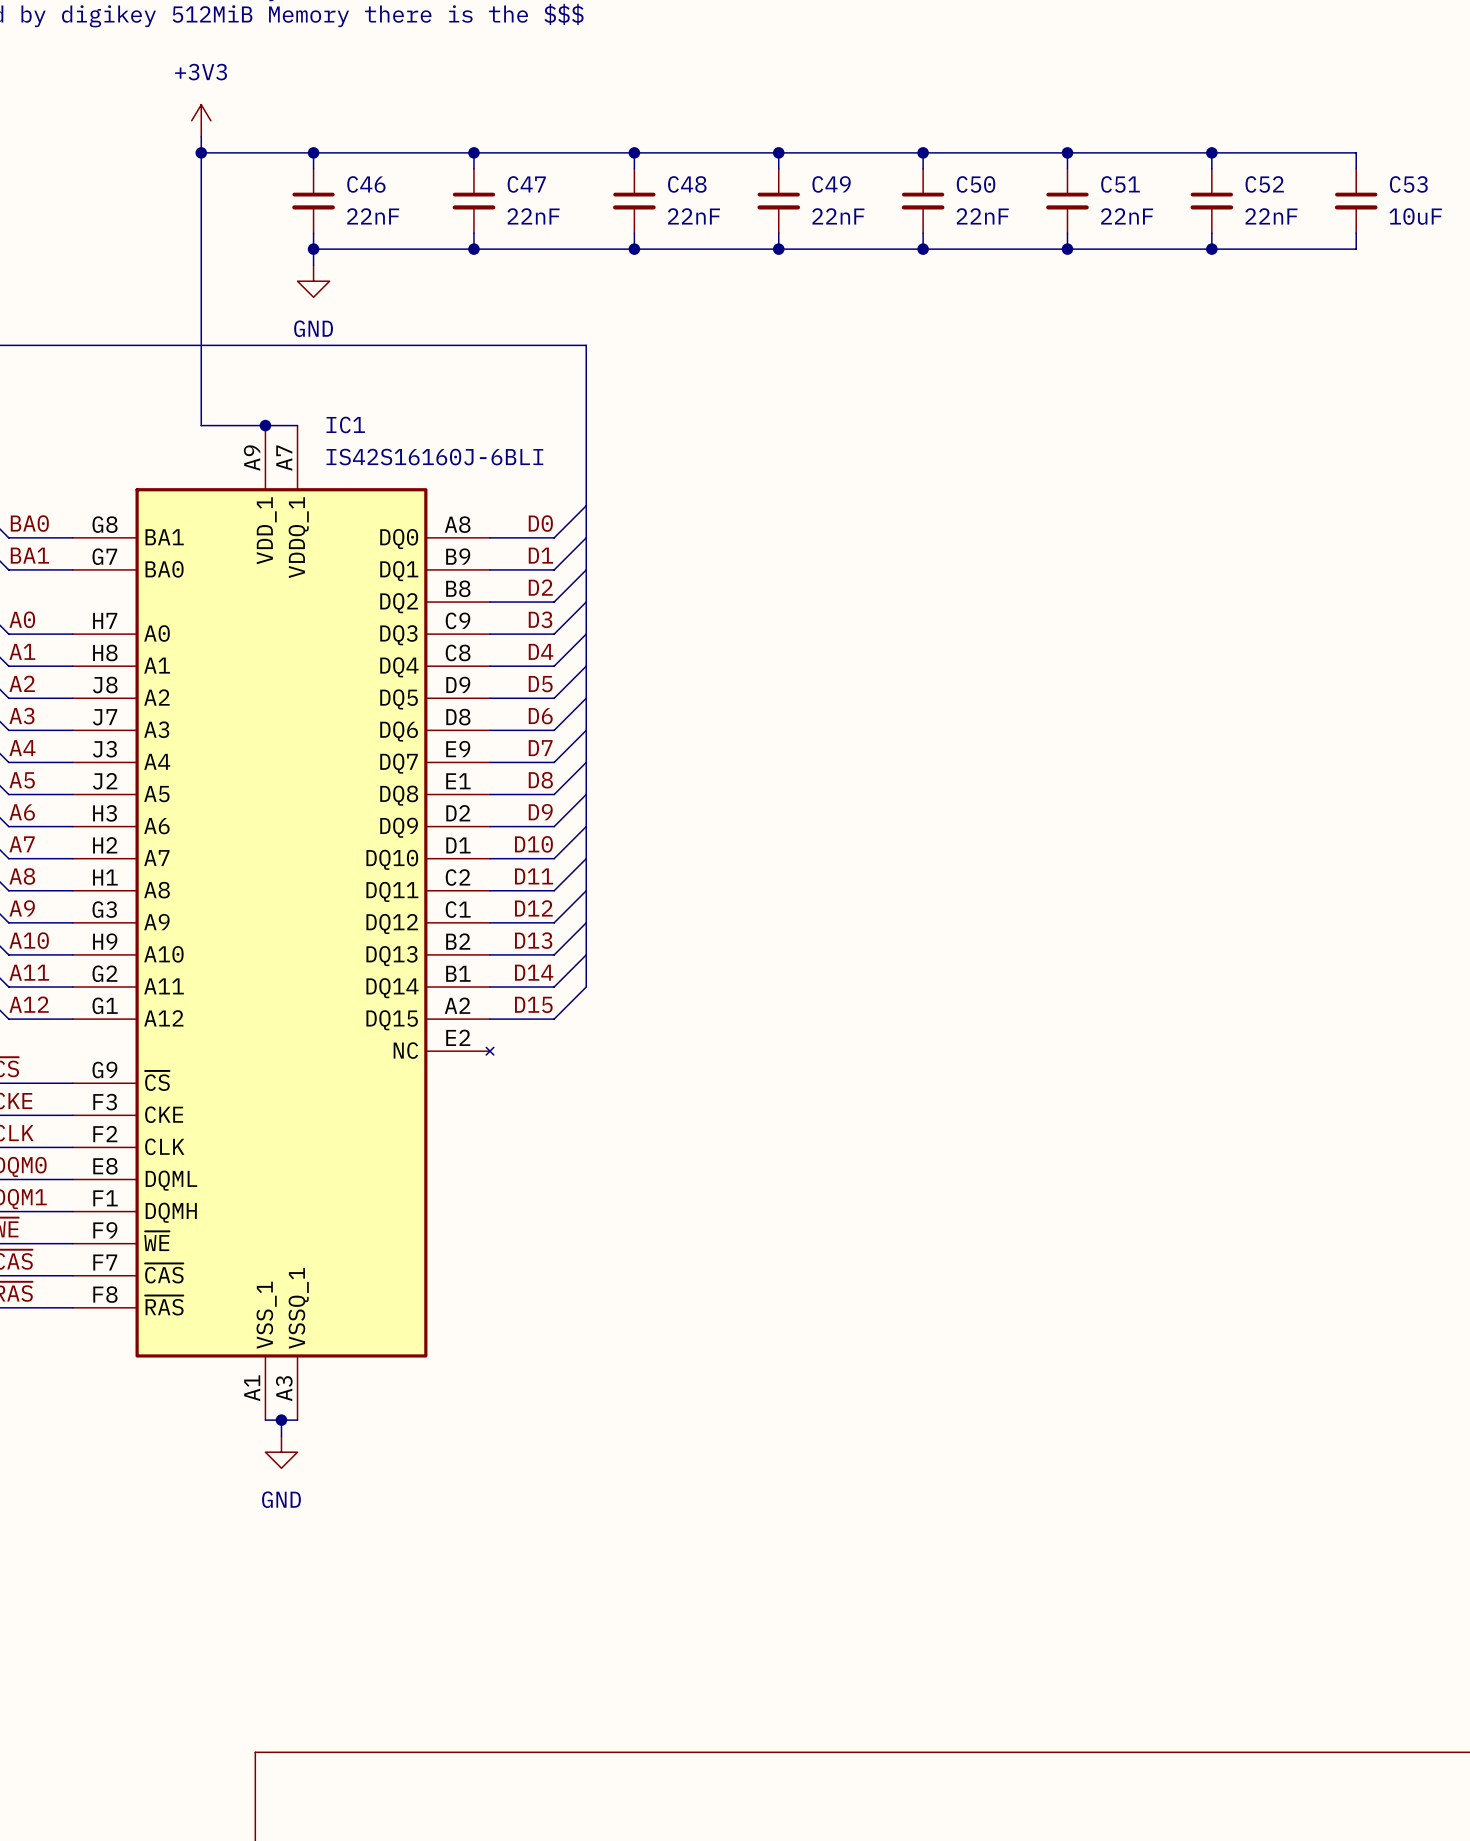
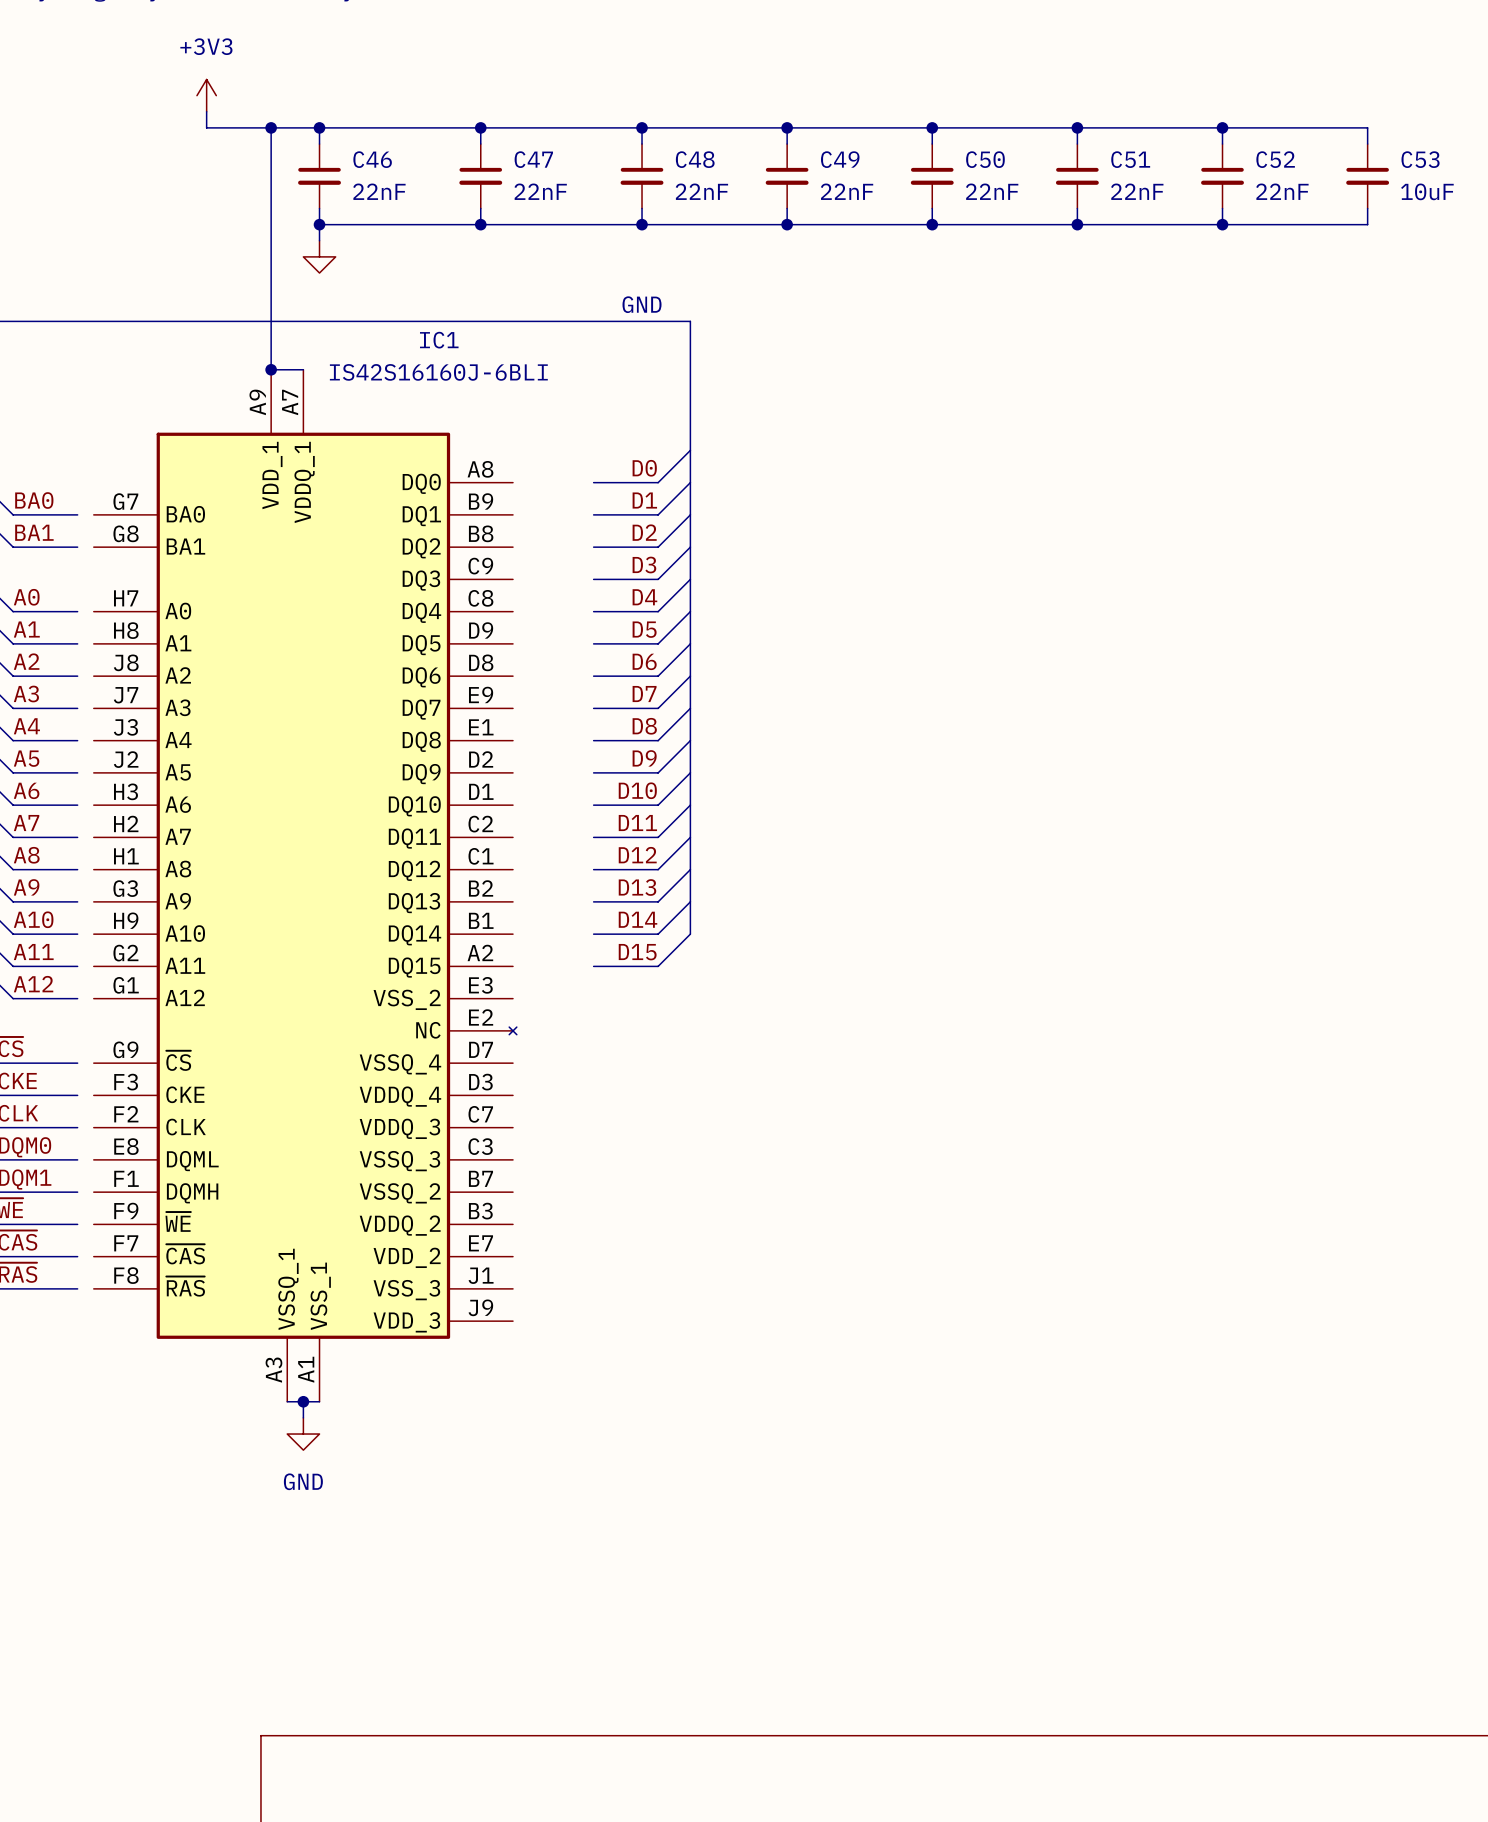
wire: (201, 152) (201, 425) (297, 425) -> none
junction position: (201, 152) -> (271, 127)
wire: none -> (271, 127) (271, 369) (303, 369)
power symbol text position: GND (313, 328) -> GND (642, 304)
bus: (586, 345) (586, 987) -> (593, 321) (690, 321) (690, 934)
IC1 name position: IC1 (345, 424) -> IC1 (439, 340)
IC1 symbol: [72, 425, 494, 1421] -> [93, 369, 517, 1402]
junction position: (265, 425) -> (271, 369)
IC1 value position: IS42S16160J-6BLI (434, 457) -> IS42S16160J-6BLI (438, 372)
wire: (586, 505) (554, 537) (490, 537) -> (593, 482) (658, 482) (690, 450)
label position: D0 (540, 523) -> D0 (644, 468)
wire: (586, 537) (554, 569) (490, 569) -> (593, 514) (658, 514) (690, 482)
label position: D1 (540, 555) -> D1 (644, 500)
wire: (586, 569) (554, 602) (490, 602) -> (593, 547) (658, 547) (690, 514)
label position: D2 (540, 587) -> D2 (644, 532)
wire: (586, 602) (554, 634) (490, 634) -> (593, 579) (658, 579) (690, 547)
label position: D3 (540, 619) -> D3 (644, 565)
wire: (586, 634) (554, 666) (490, 666) -> (593, 611) (658, 611) (690, 579)
label position: D4 (541, 651) -> D4 (644, 597)
wire: (586, 666) (554, 698) (490, 698) -> (593, 643) (658, 643) (690, 611)
label position: D5 (540, 684) -> D5 (644, 629)
wire: (586, 698) (554, 730) (490, 730) -> (593, 676) (658, 676) (690, 643)
label position: D6 (540, 716) -> D6 (644, 661)
wire: (586, 730) (554, 762) (490, 762) -> (593, 708) (658, 708) (690, 676)
label position: D7 (540, 748) -> D7 (644, 694)
wire: (586, 762) (554, 794) (490, 794) -> (593, 740) (658, 740) (690, 708)
label position: D8 (540, 780) -> D8 (644, 726)
wire: (586, 794) (554, 826) (490, 826) -> (593, 772) (658, 772) (690, 740)
label position: D9 (540, 812) -> D9 (644, 758)
wire: (586, 826) (554, 858) (490, 858) -> (593, 805) (658, 805) (690, 772)
label position: D10 (533, 844) -> D10 (637, 790)
wire: (586, 858) (554, 890) (490, 890) -> (593, 837) (658, 837) (690, 805)
label position: D11 (534, 876) -> D11 (637, 823)
wire: (586, 890) (554, 922) (490, 922) -> (593, 869) (658, 869) (690, 837)
label position: D12 (533, 908) -> D12 (637, 855)
wire: (586, 922) (554, 954) (490, 954) -> (593, 901) (658, 901) (690, 869)
label position: D13 (533, 940) -> D13 (637, 887)
wire: (586, 954) (554, 987) (490, 987) -> (593, 934) (658, 934) (690, 901)
label position: D14 (534, 972) -> D14 (638, 919)
wire: (586, 987) (554, 1019) (490, 1019) -> (593, 966) (658, 966) (690, 934)
label position: D15 (533, 1004) -> D15 (637, 952)
wire: (265, 1420) (281, 1420) (281, 1436) -> none
junction position: (281, 1420) -> (303, 1401)
wire: none -> (319, 1401) (303, 1401) (303, 1417)
power symbol position: GND (281, 1452) -> GND (303, 1434)

